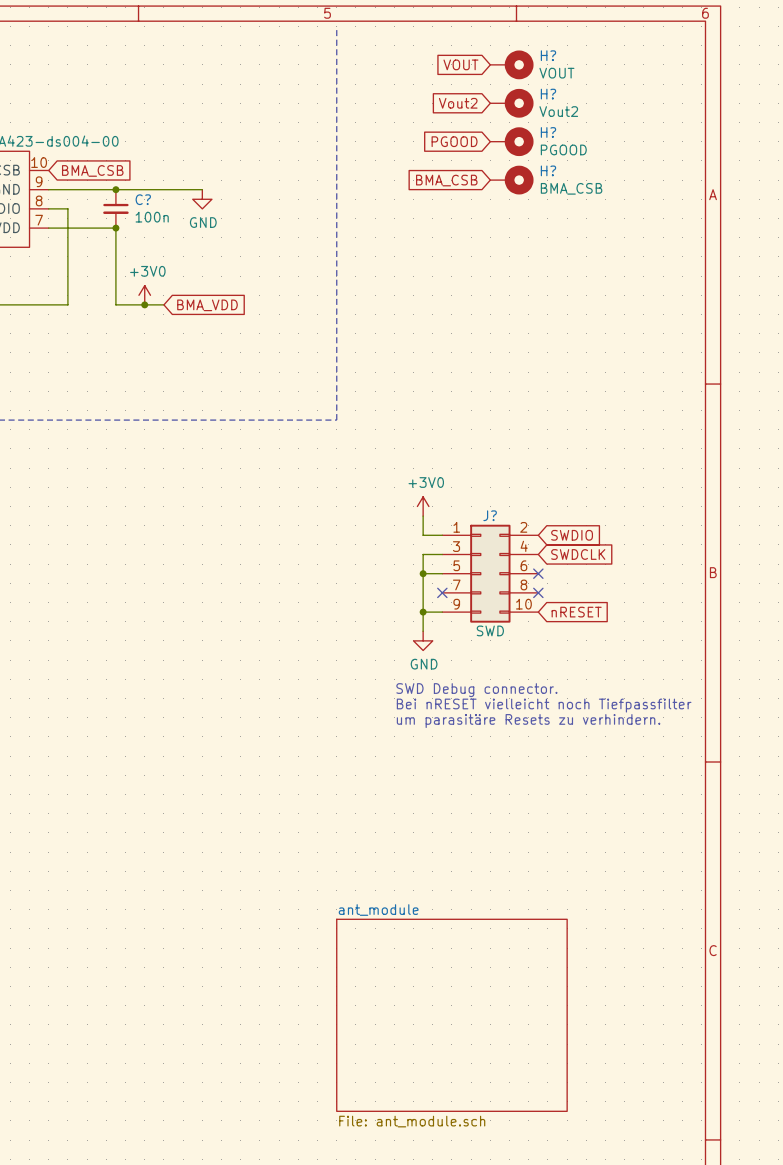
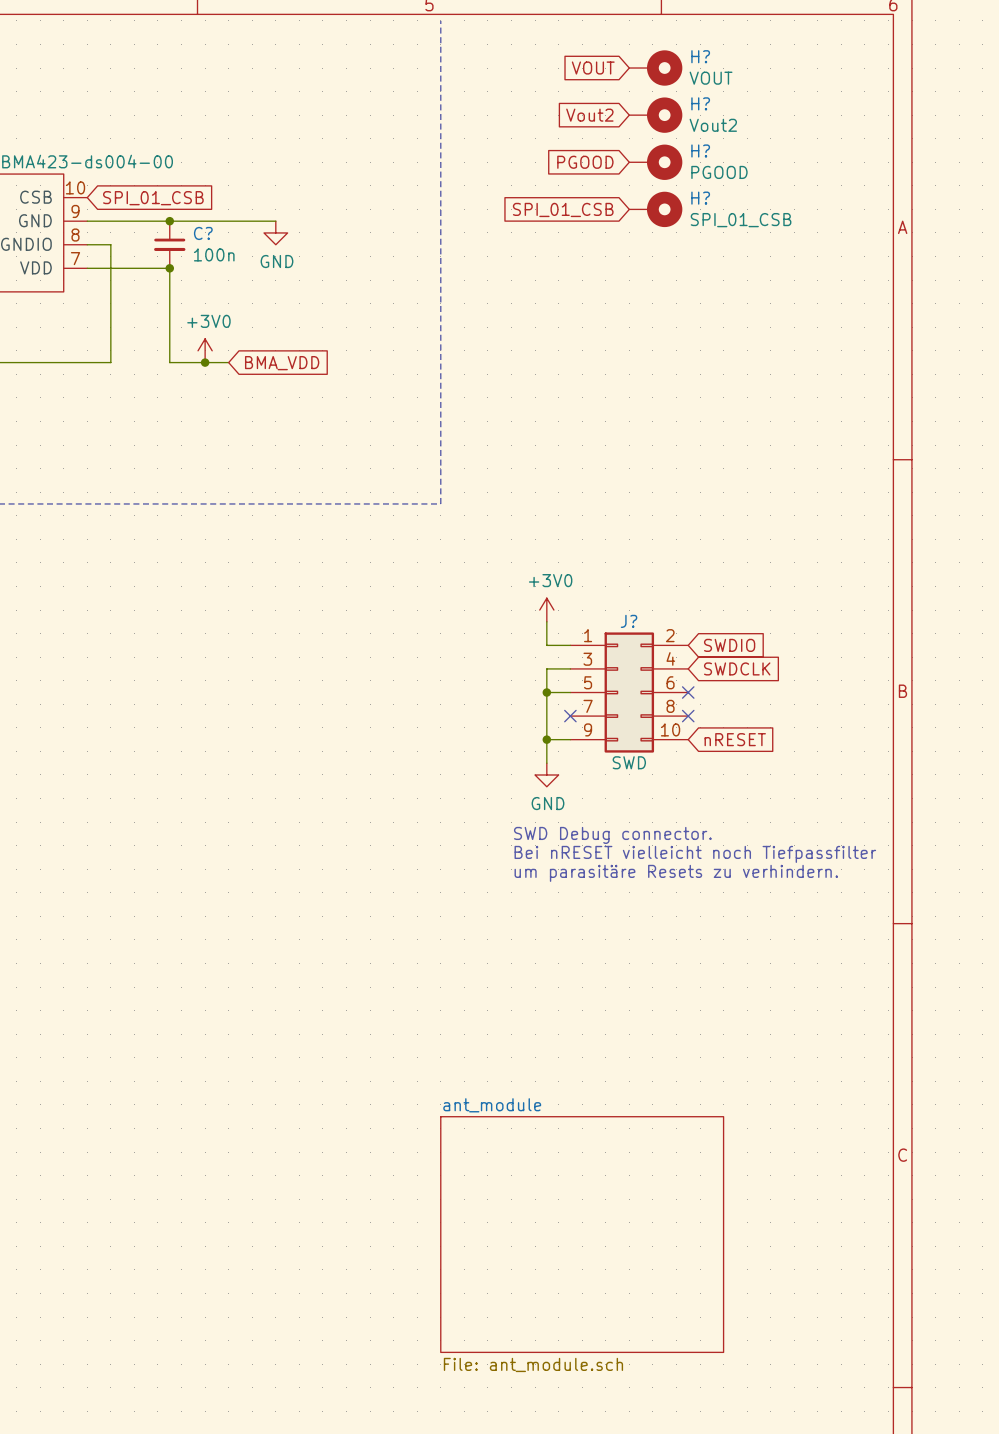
global label: BMA_CSB (92, 170) -> SPI_01_CSB (153, 198)
global label: BMA_CSB (446, 180) -> SPI_01_CSB (563, 209)
H? value: BMA_CSB (571, 188) -> SPI_01_CSB (741, 220)

